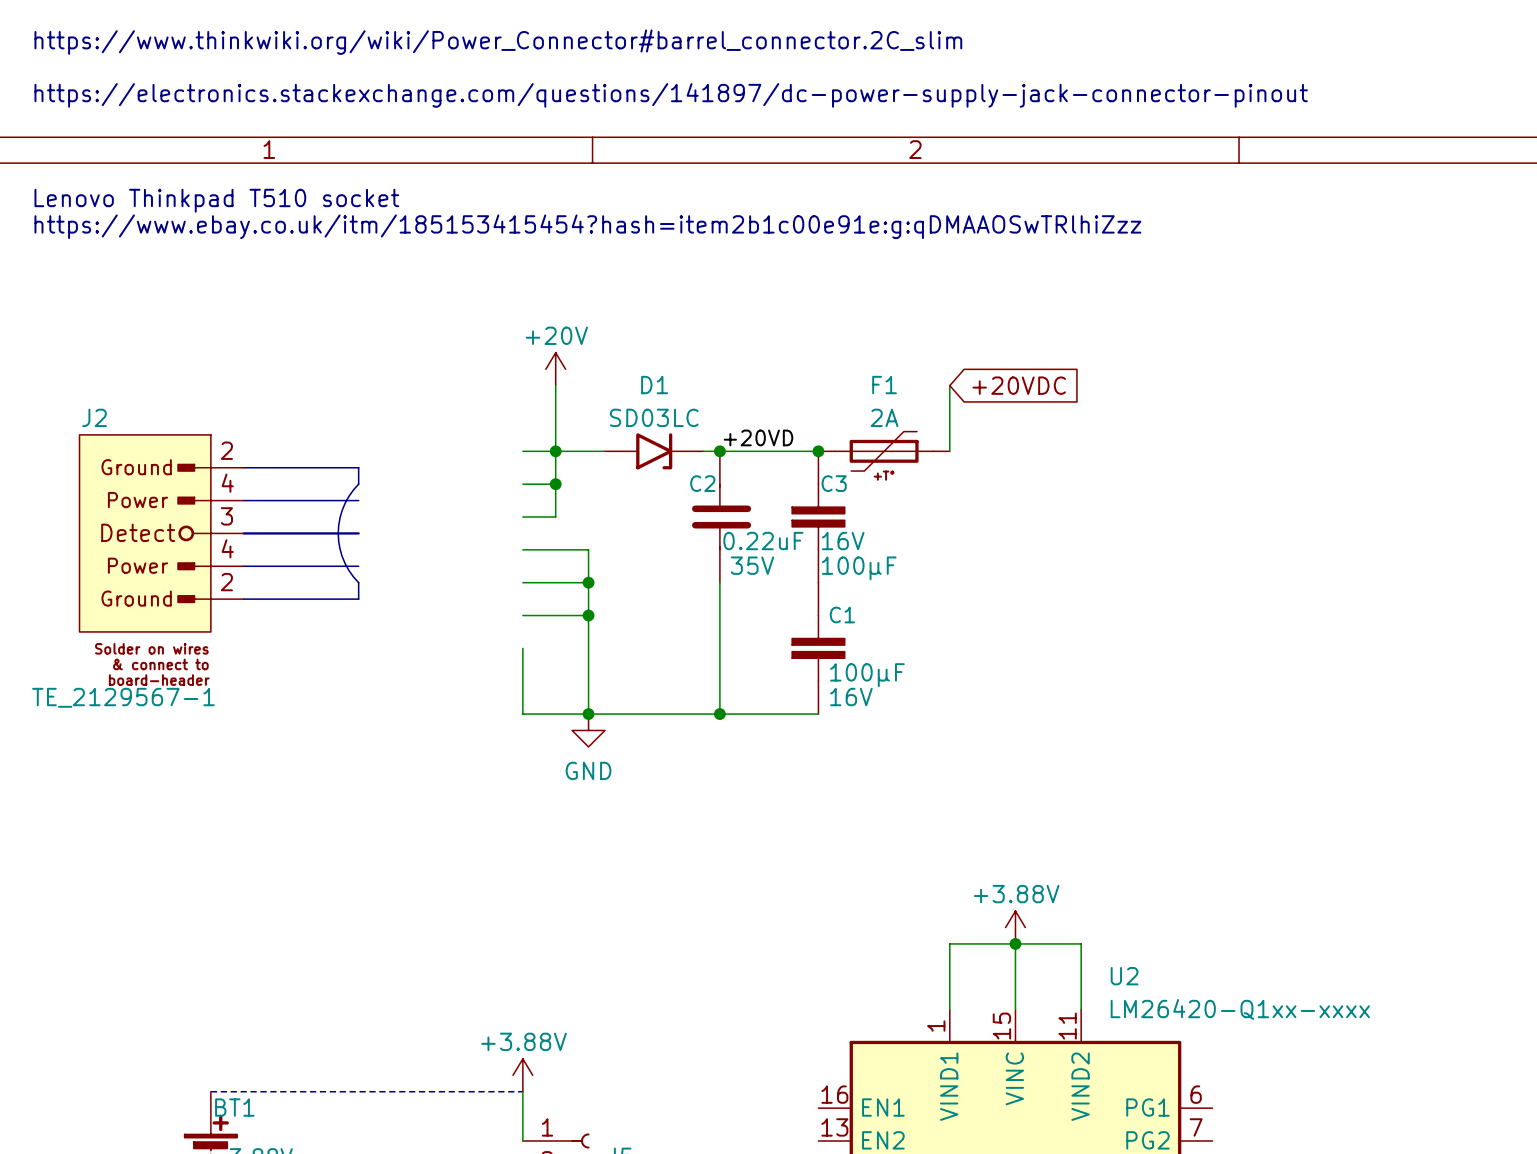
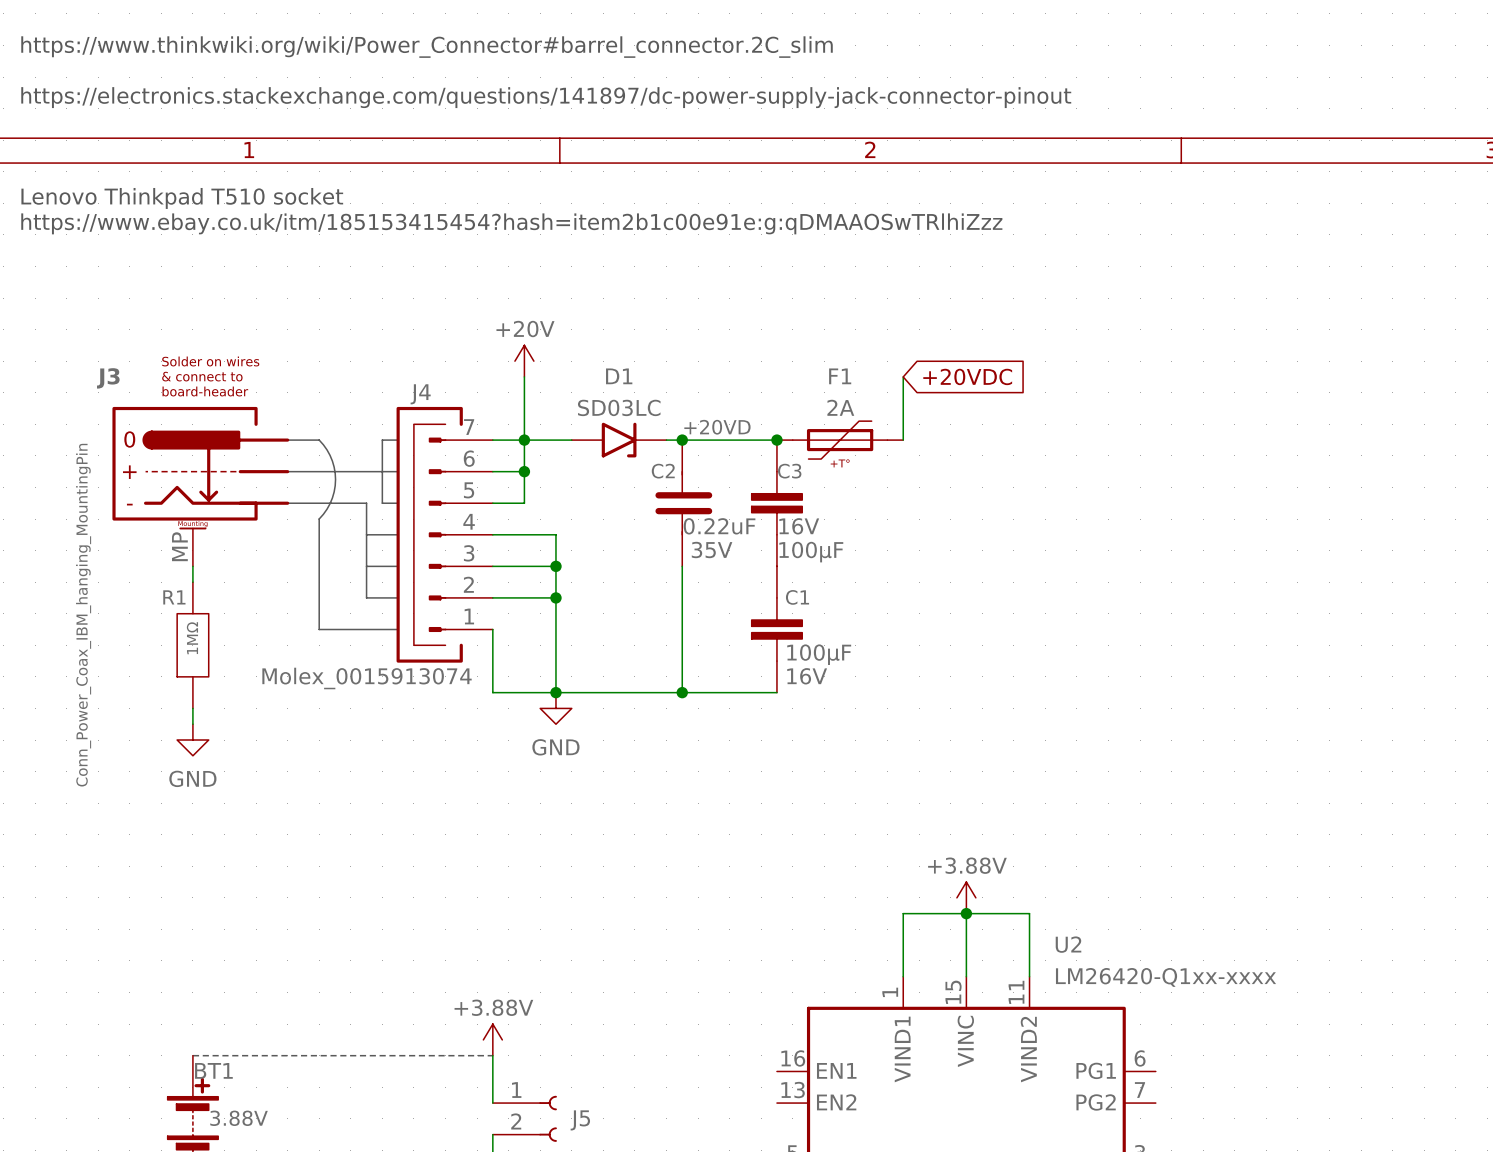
line: none -> (287, 440) (319, 440) (330, 455) (335, 473) (332, 497) (319, 519) (319, 629) (398, 629)
line: none -> (398, 440) (382, 440) (382, 503) (398, 503)
line: (243, 467) (358, 467) (358, 484) (345, 503) (340, 517) (338, 533) (340, 548) (345, 563) (358, 582) (358, 599) (243, 599) -> none
J3: none -> Conn_Power_Coax_IBM_hanging_MountingPin (200, 486)
line: (243, 500) (358, 500) -> (287, 471) (398, 471)
line: none -> (287, 503) (366, 503) (366, 597) (398, 597)
J2: TE_2129567-1 (161, 533) -> none
line: (243, 533) (358, 533) -> none
line: none -> (366, 534) (398, 534)
J4: none -> Molex_0015913074 (444, 534)
line: (243, 566) (358, 566) -> none
line: none -> (366, 566) (398, 566)
R1: none -> (192, 645)
wire: none -> (192, 708) (192, 724)
power symbol: none -> GND (192, 740)

